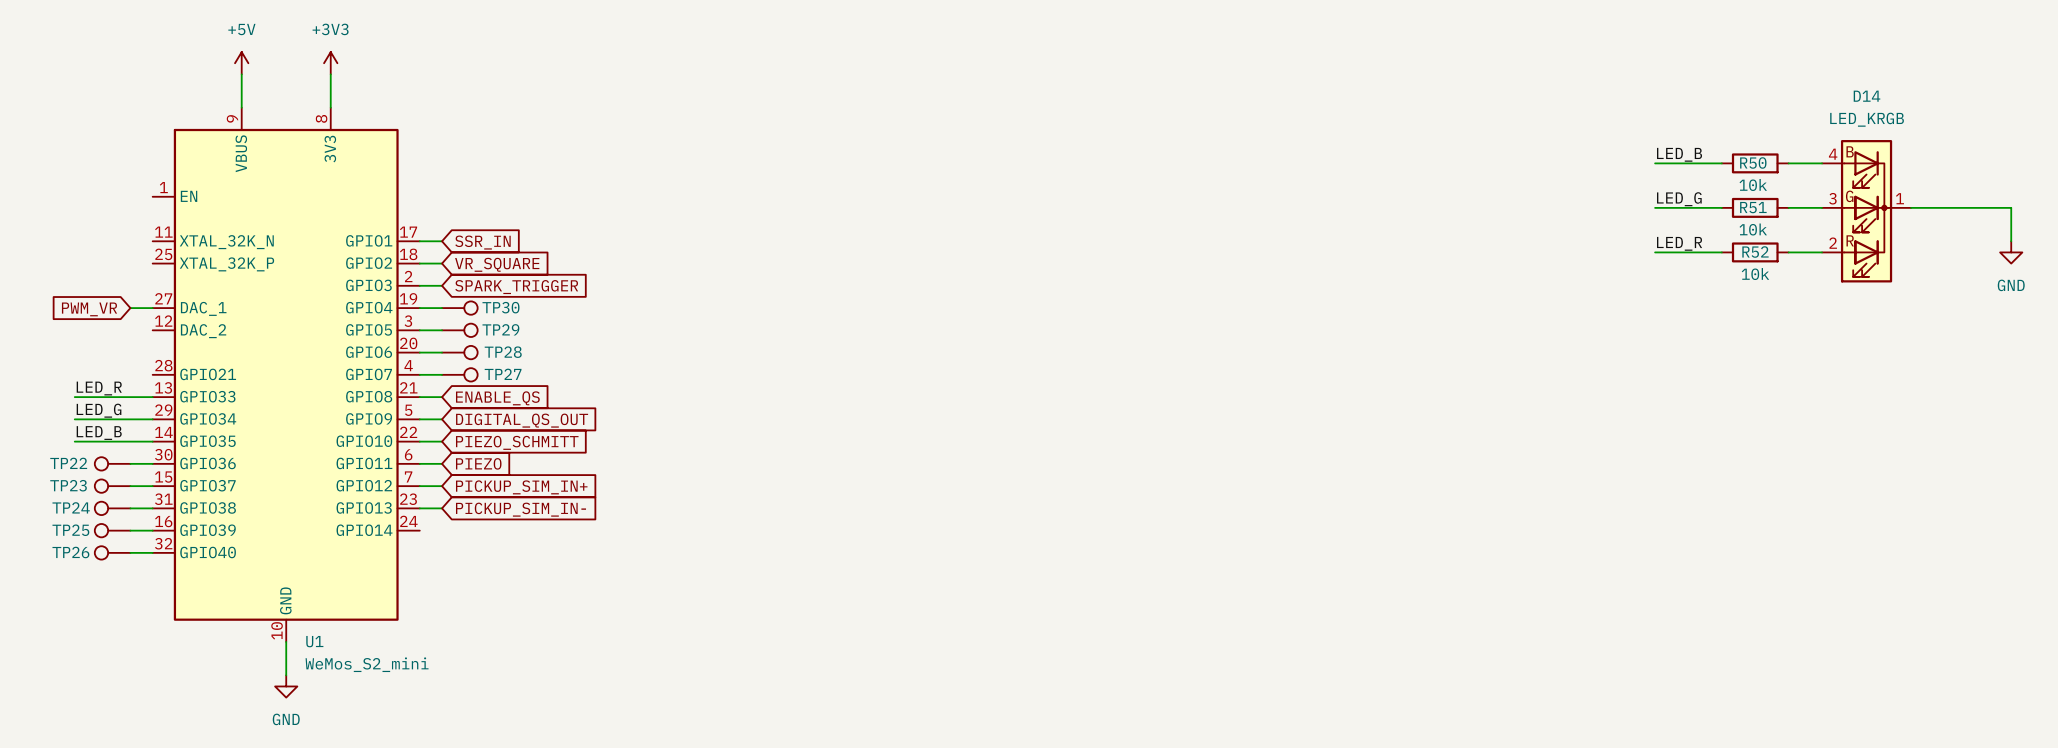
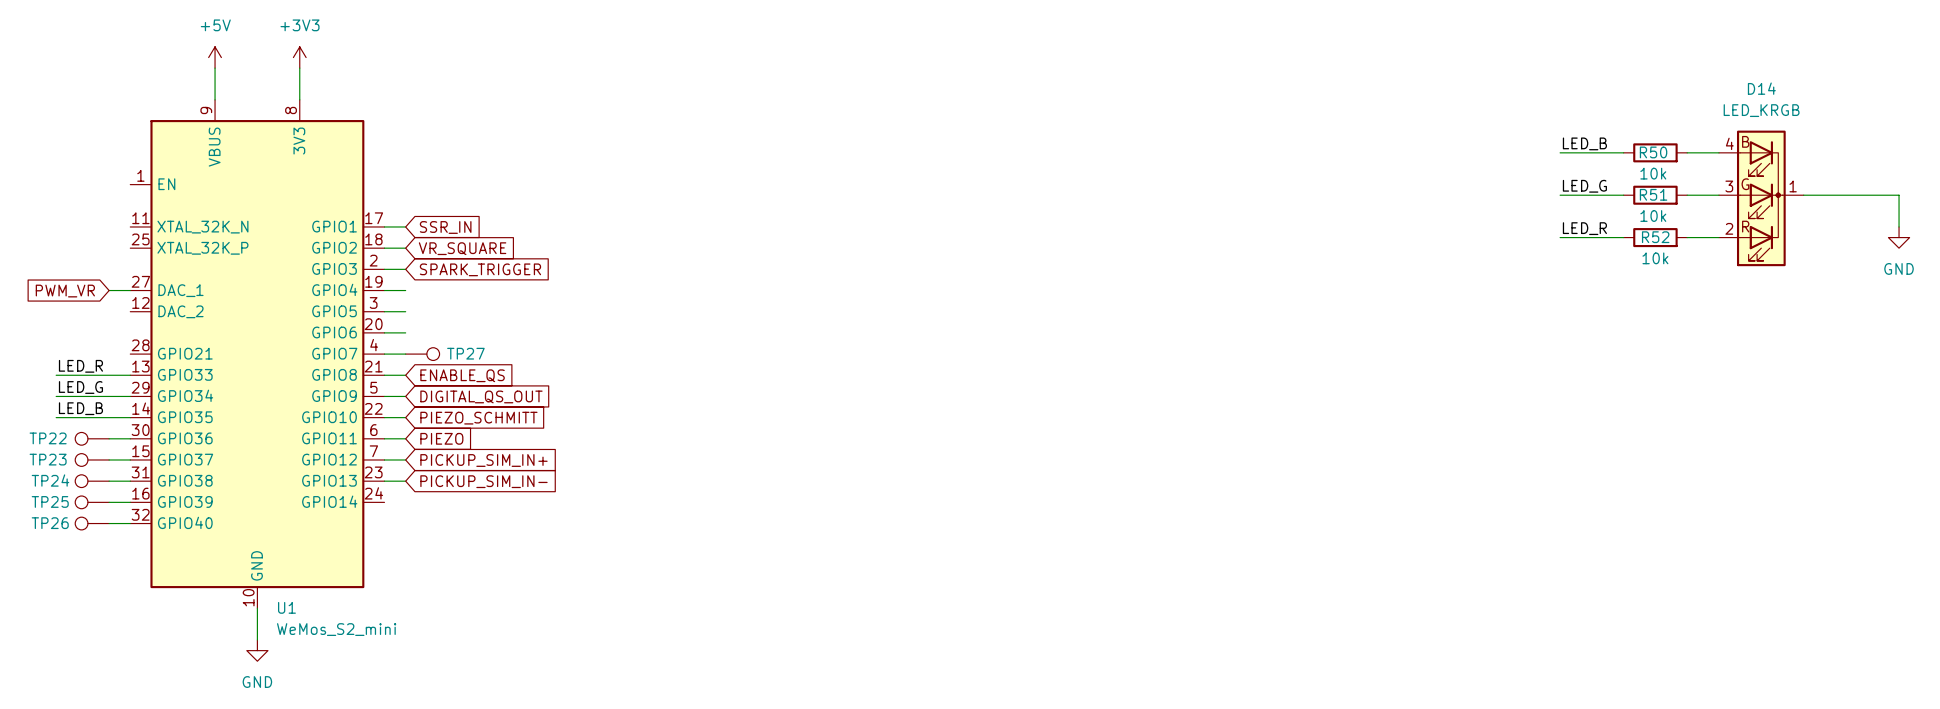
TP30: (459, 308) -> none
TP29: (459, 330) -> none
TP28: (459, 352) -> none

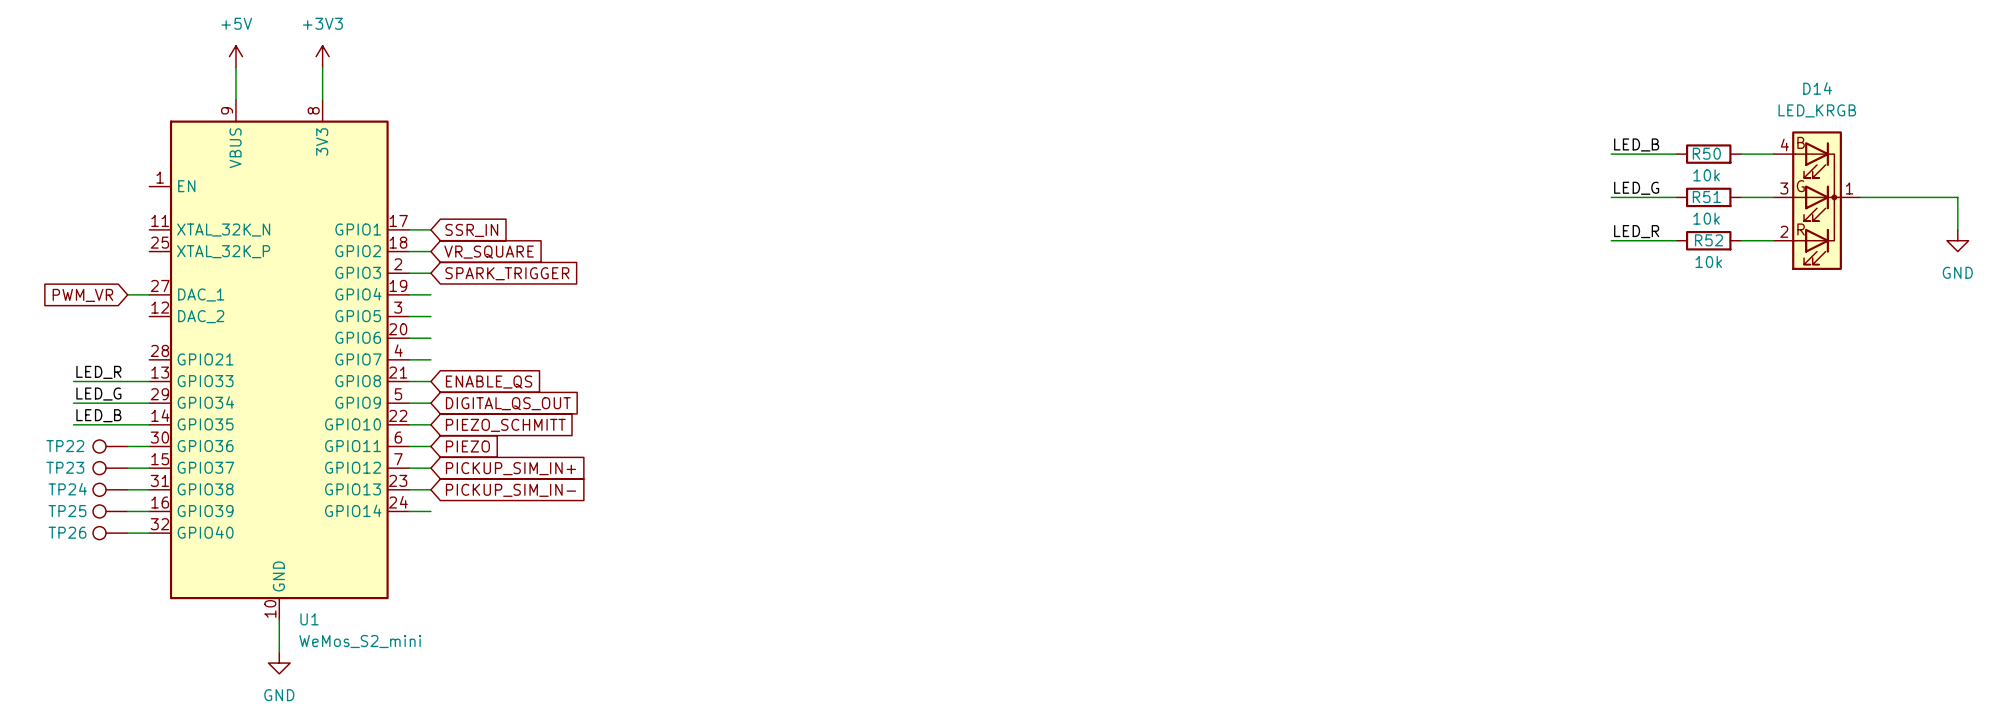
TP27: (422, 354) -> none
wire: none -> (409, 511) (430, 511)

